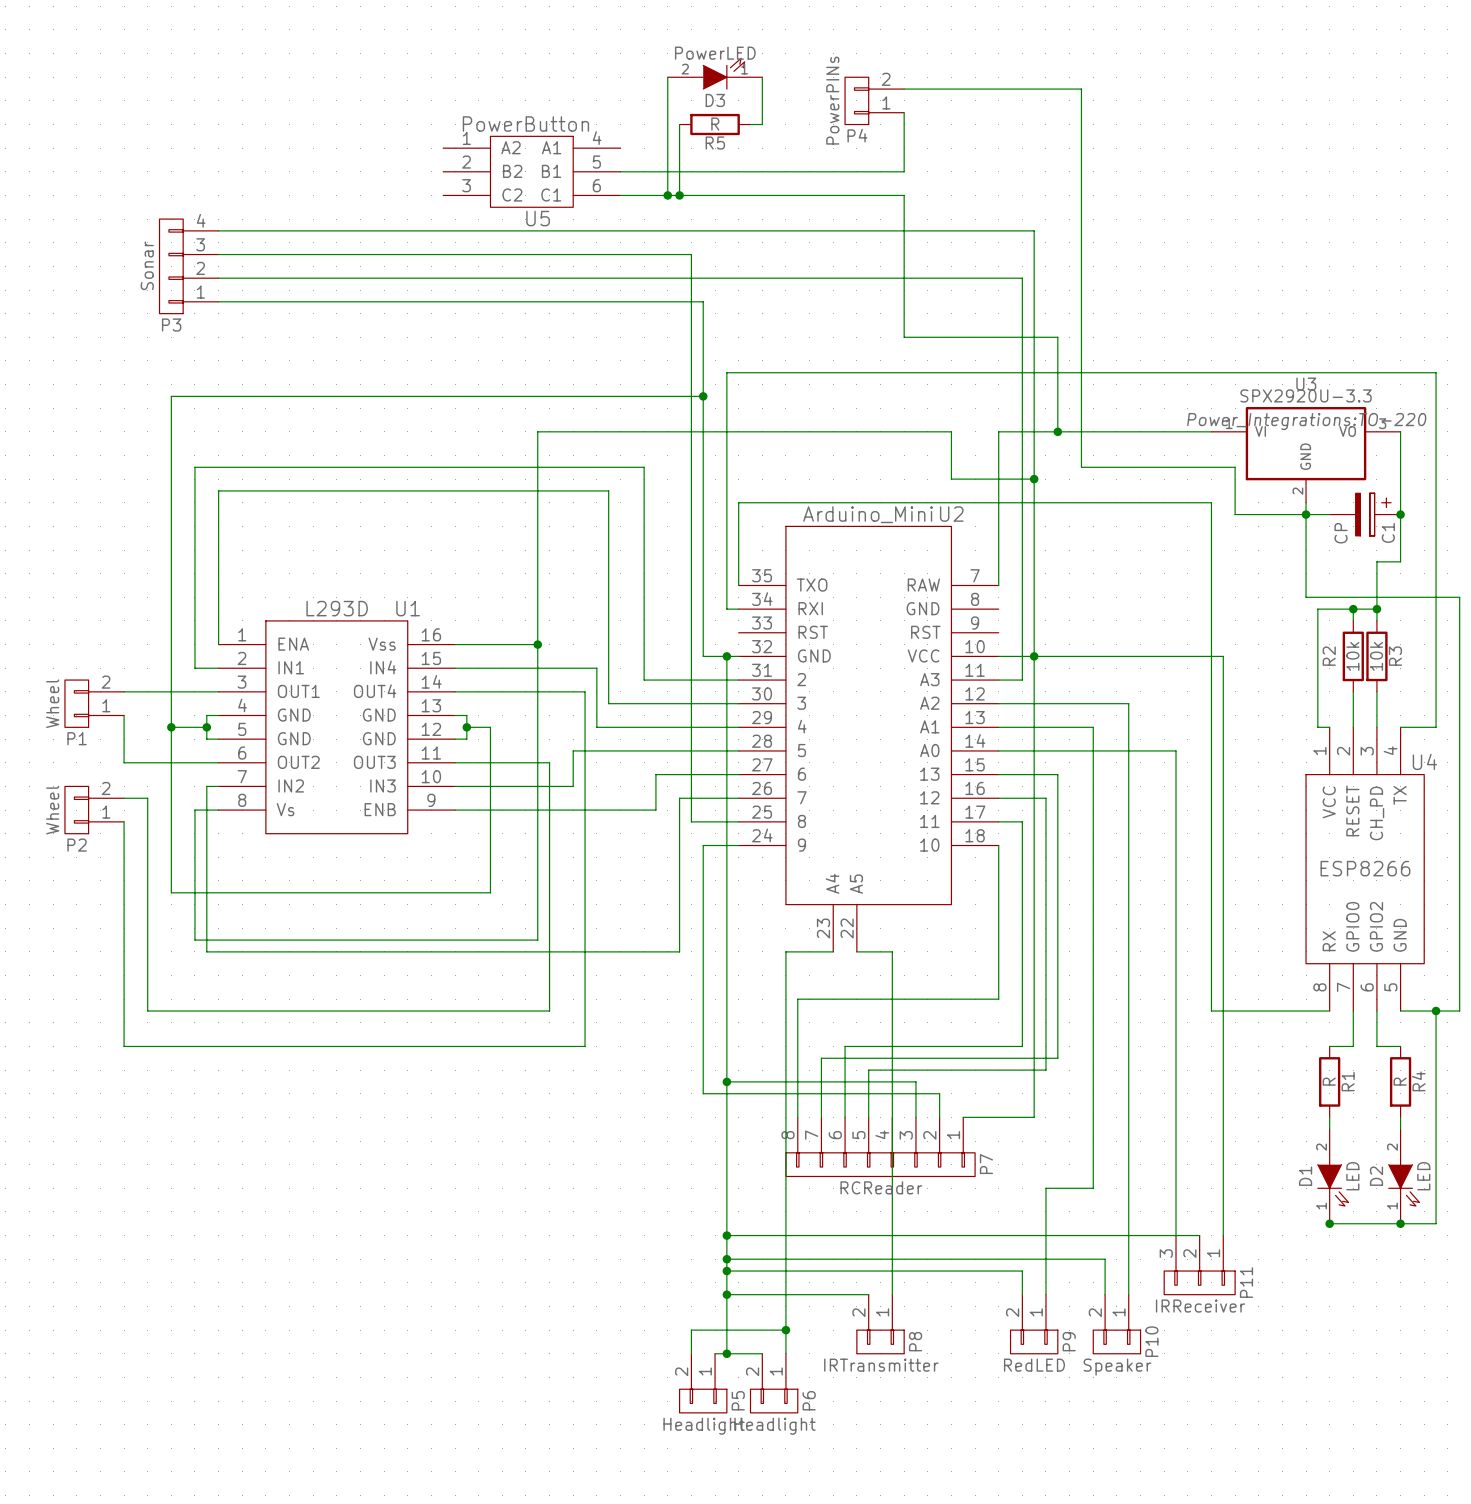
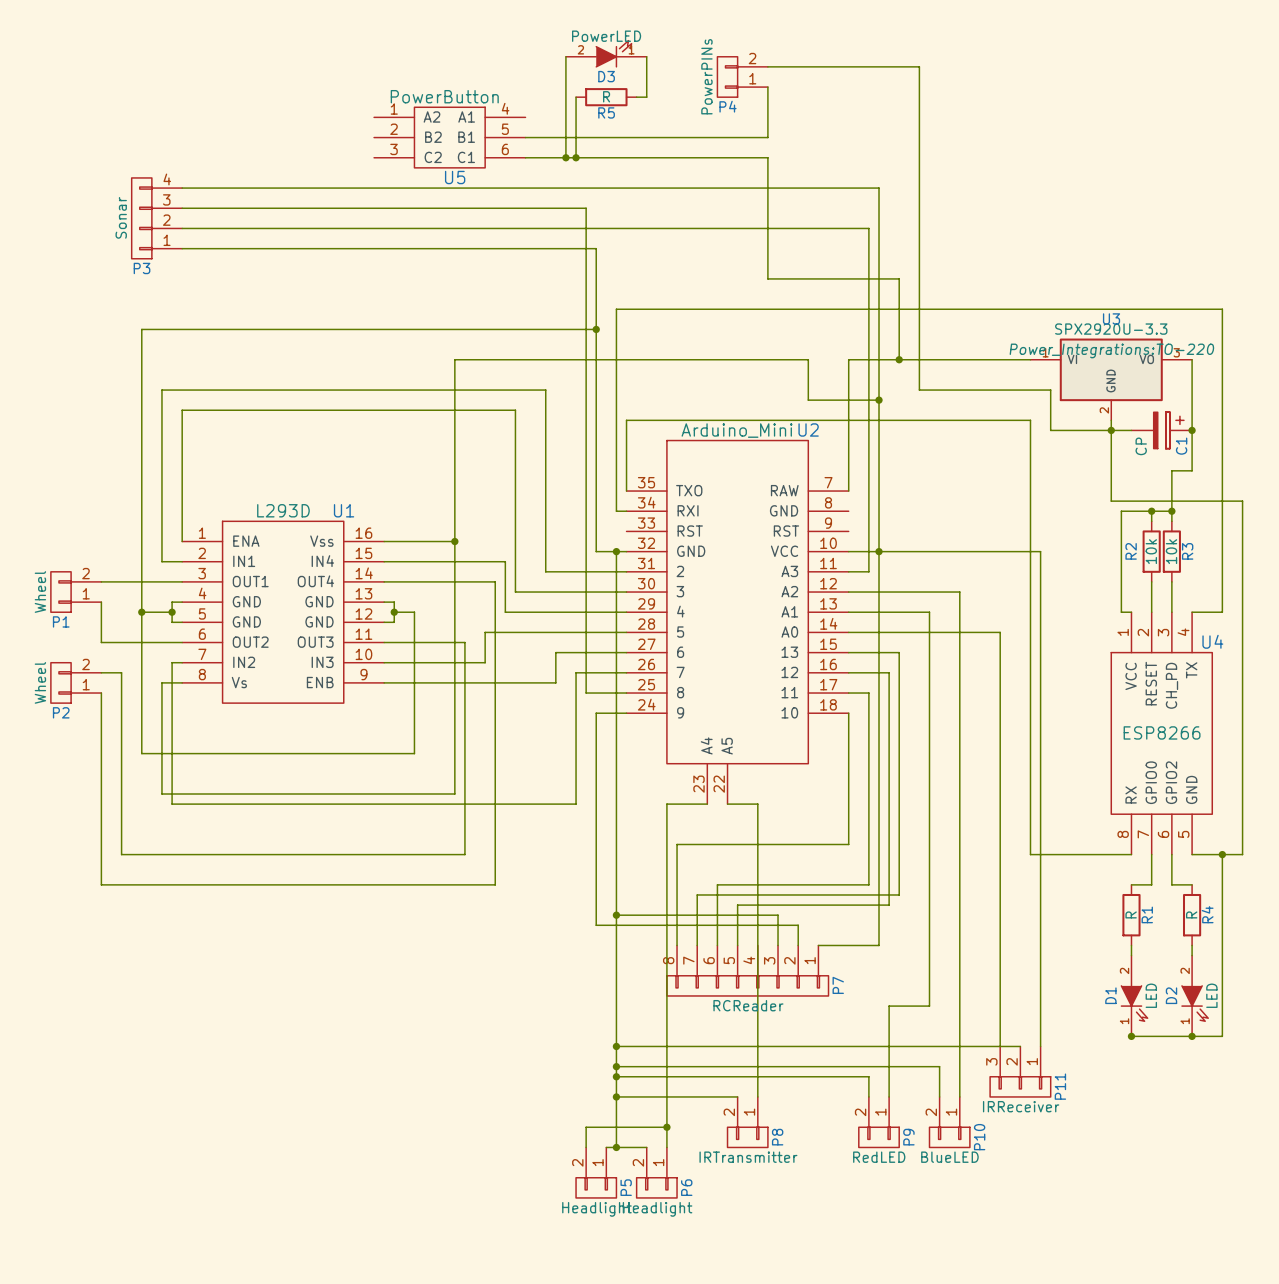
P10 value: Speaker (1117, 1367) -> BlueLED (949, 1157)

